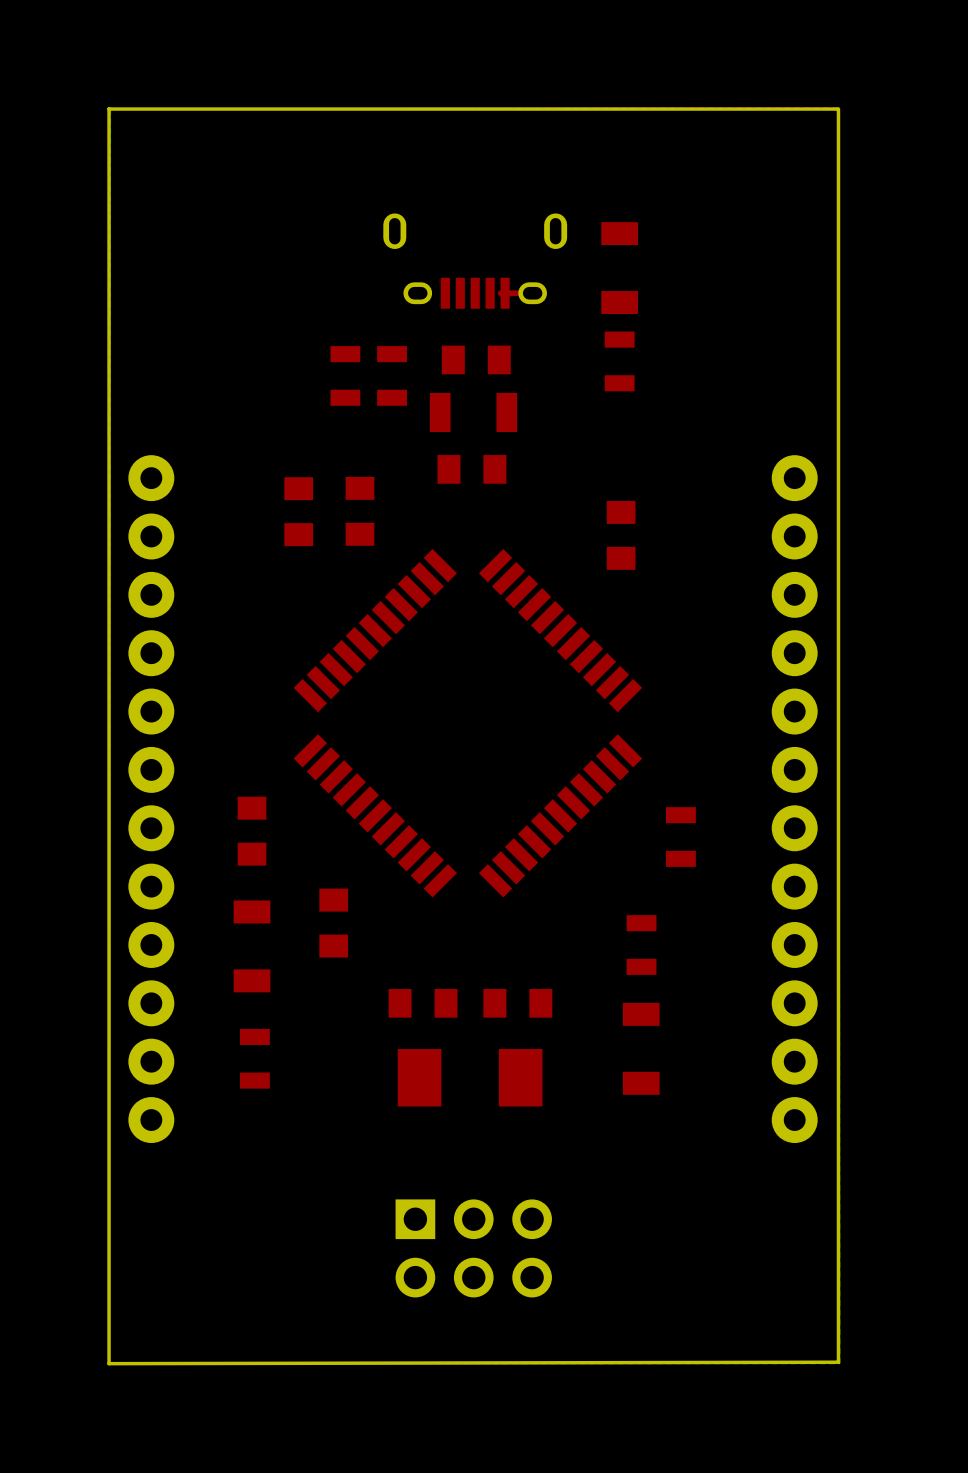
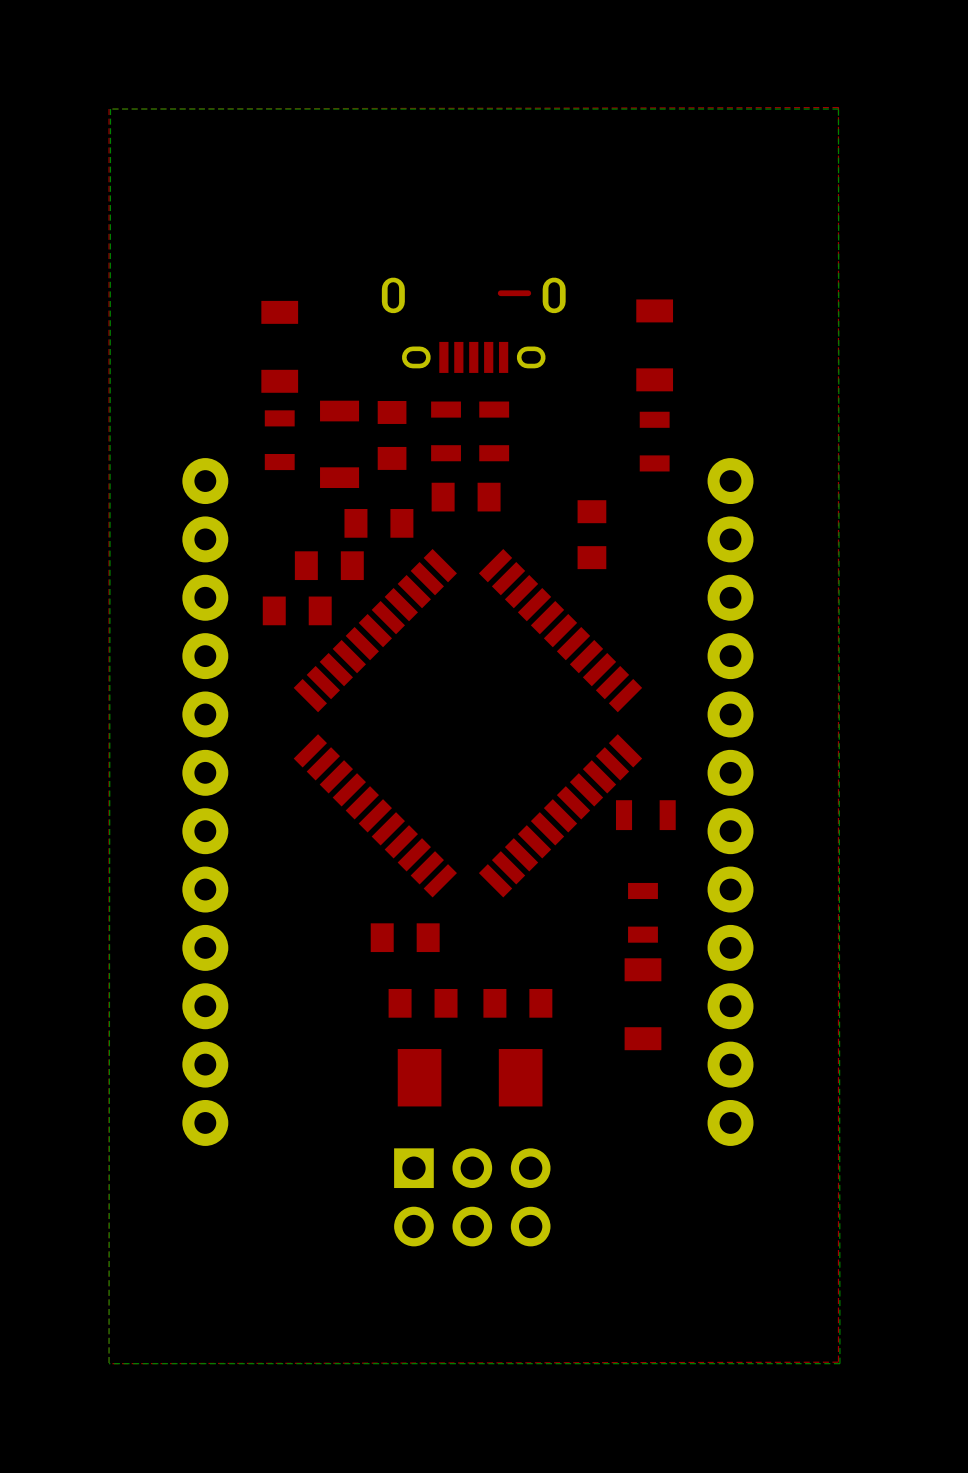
board edge: (838, 109) (838, 1362) (109, 1363) (109, 109) (837, 109) -> none
part position: (475, 261) -> (473, 325)
part position: (619, 268) -> (654, 345)
part: none -> (279, 346)
part: (476, 359) -> none
part: (619, 361) -> none
part: (345, 375) -> none
part: (392, 375) -> none
part rotation: 0° (473, 412) -> 90° clockwise (339, 444)
part position: (473, 412) -> (339, 444)
part: none -> (446, 431)
part: none -> (494, 431)
part: none -> (392, 435)
part: none -> (279, 440)
part: none -> (654, 441)
part position: (471, 469) -> (466, 497)
part: (298, 511) -> none
part rotation: 0° (359, 511) -> 90° clockwise (378, 523)
part position: (621, 535) -> (591, 534)
part: none -> (329, 565)
part: none -> (297, 610)
part position: (151, 799) -> (205, 802)
part position: (794, 799) -> (730, 802)
part: (252, 831) -> none
part rotation: 0° (680, 837) -> 90° clockwise (645, 815)
part position: (680, 837) -> (645, 815)
part rotation: 0° (333, 923) -> 90° clockwise (405, 937)
part position: (333, 923) -> (405, 937)
part position: (641, 945) -> (642, 912)
part: (252, 946) -> none
part position: (641, 1048) -> (642, 1004)
part: (254, 1058) -> none
part position: (473, 1248) -> (472, 1197)

